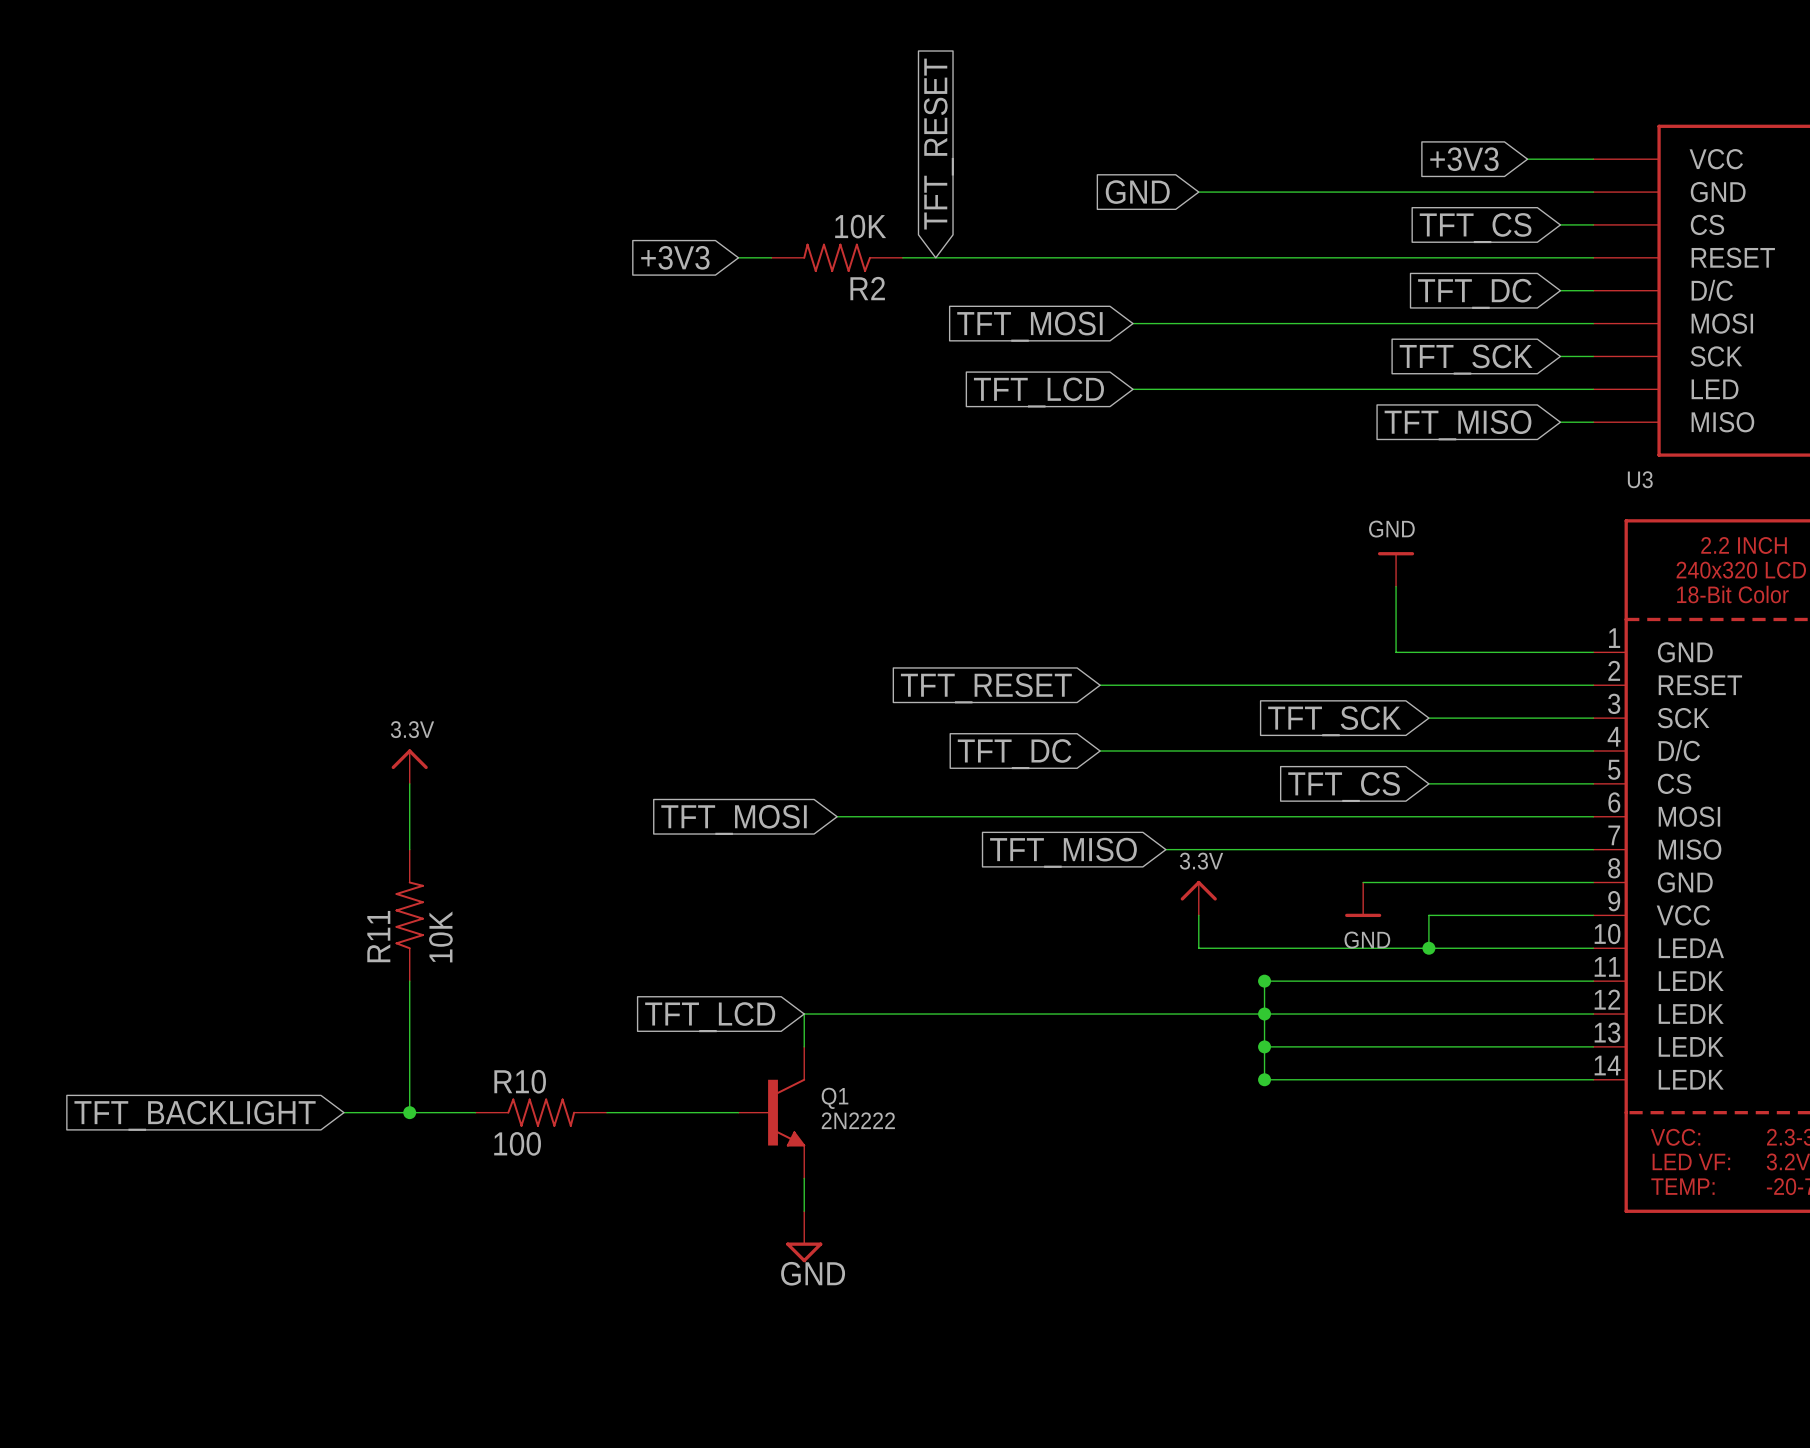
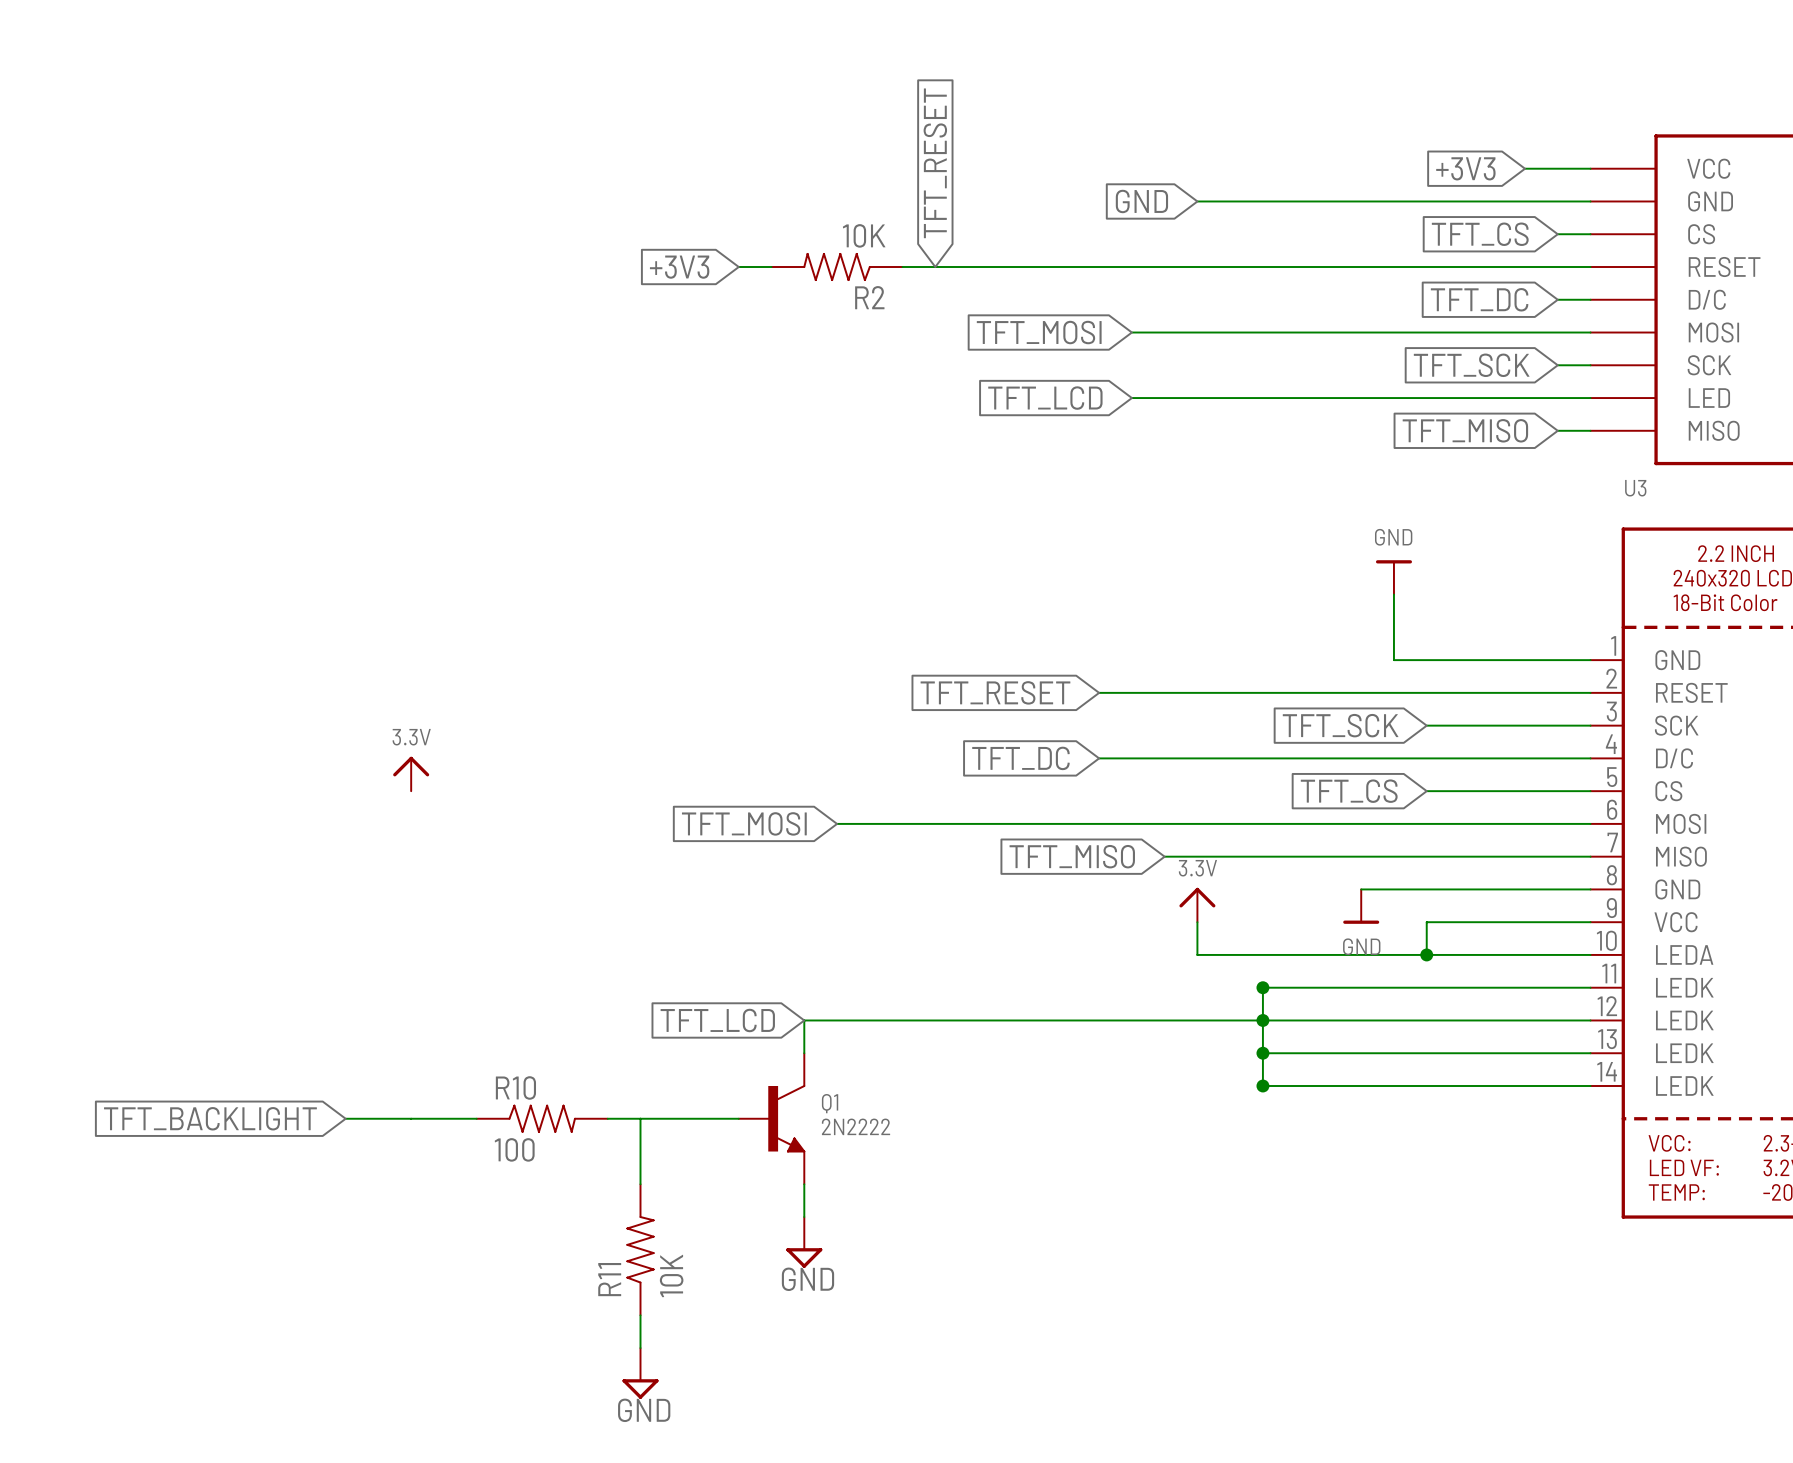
wire: (409, 783) (409, 849) -> none
R11 position: (409, 915) -> (640, 1249)
wire: (409, 981) (409, 1112) -> none
junction: (409, 1112) -> none
wire: none -> (640, 1118) (640, 1184)
wire: none -> (640, 1315) (640, 1348)
power symbol: none -> GND (640, 1373)

